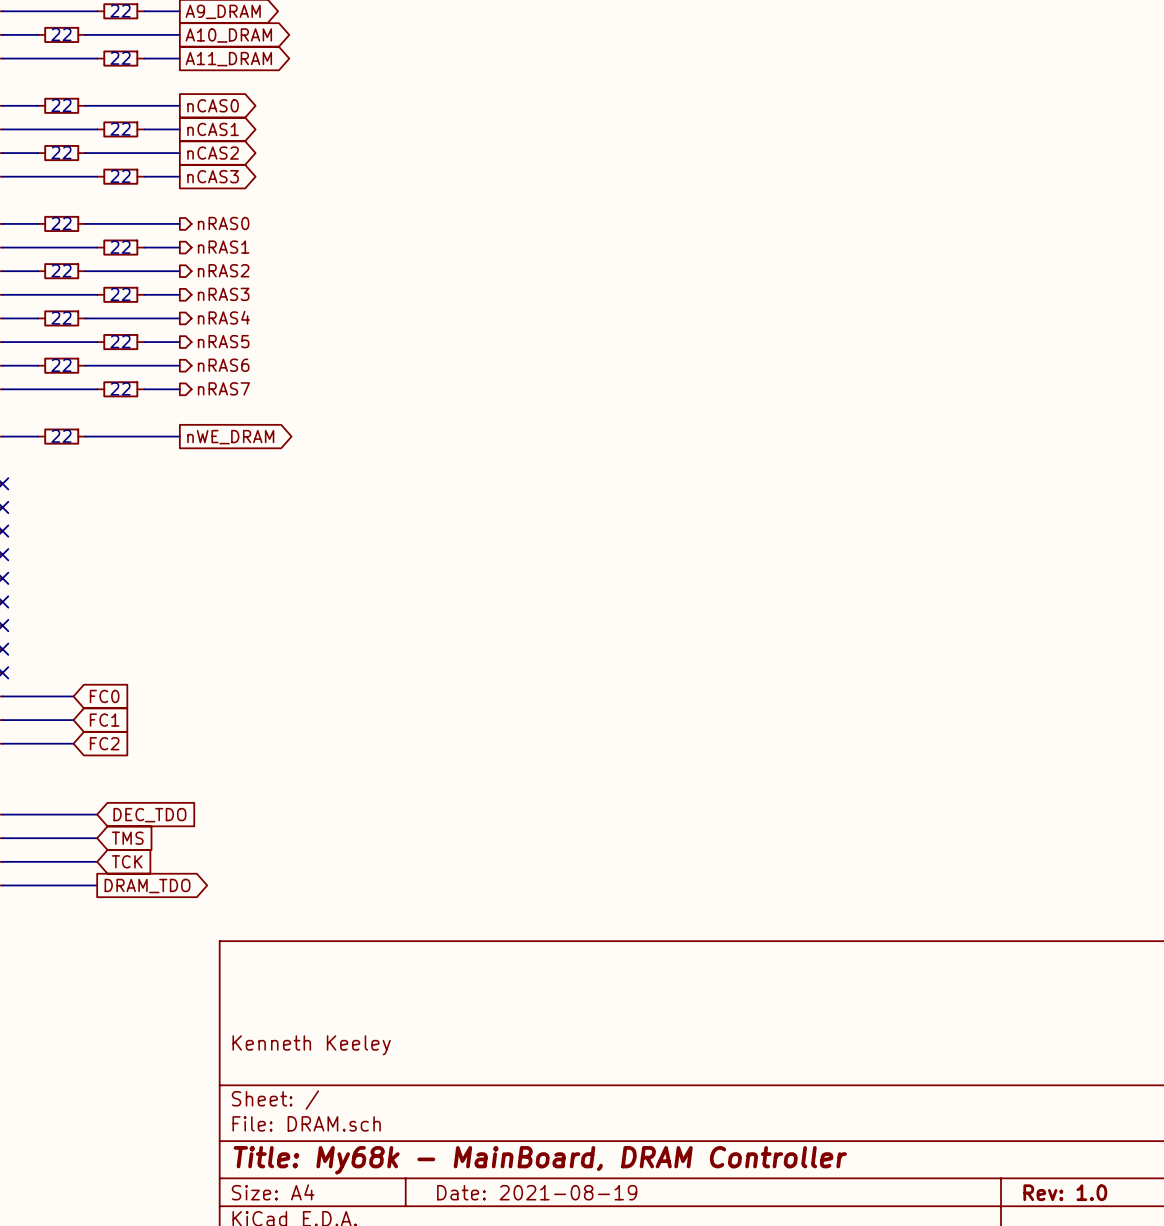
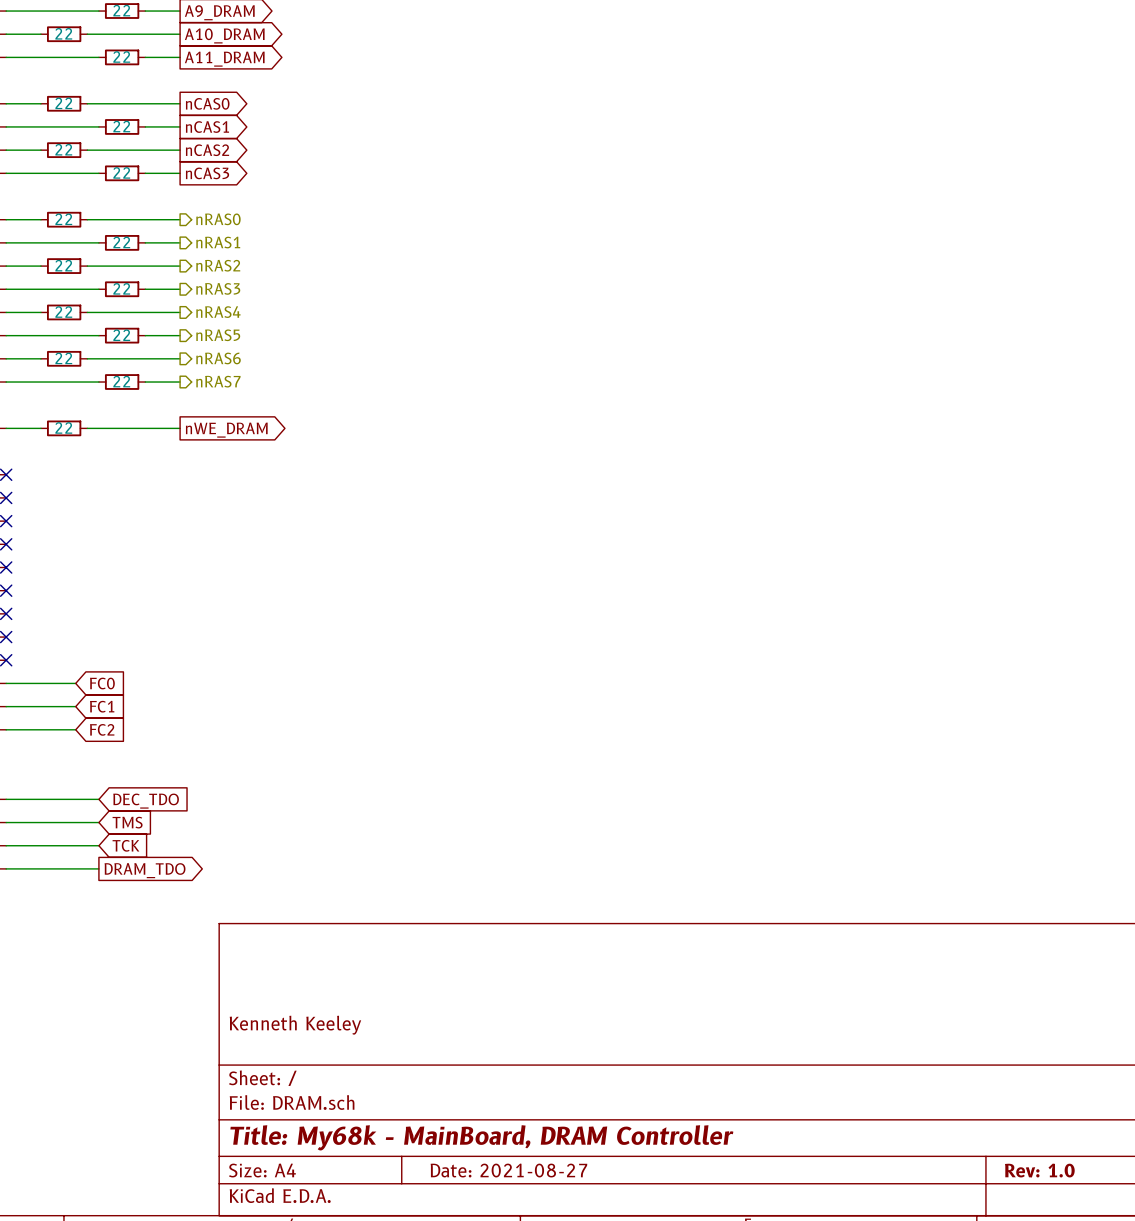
title block: Date: 2021-08-19 (537, 1192) -> Date: 2021-08-27 (508, 1170)

